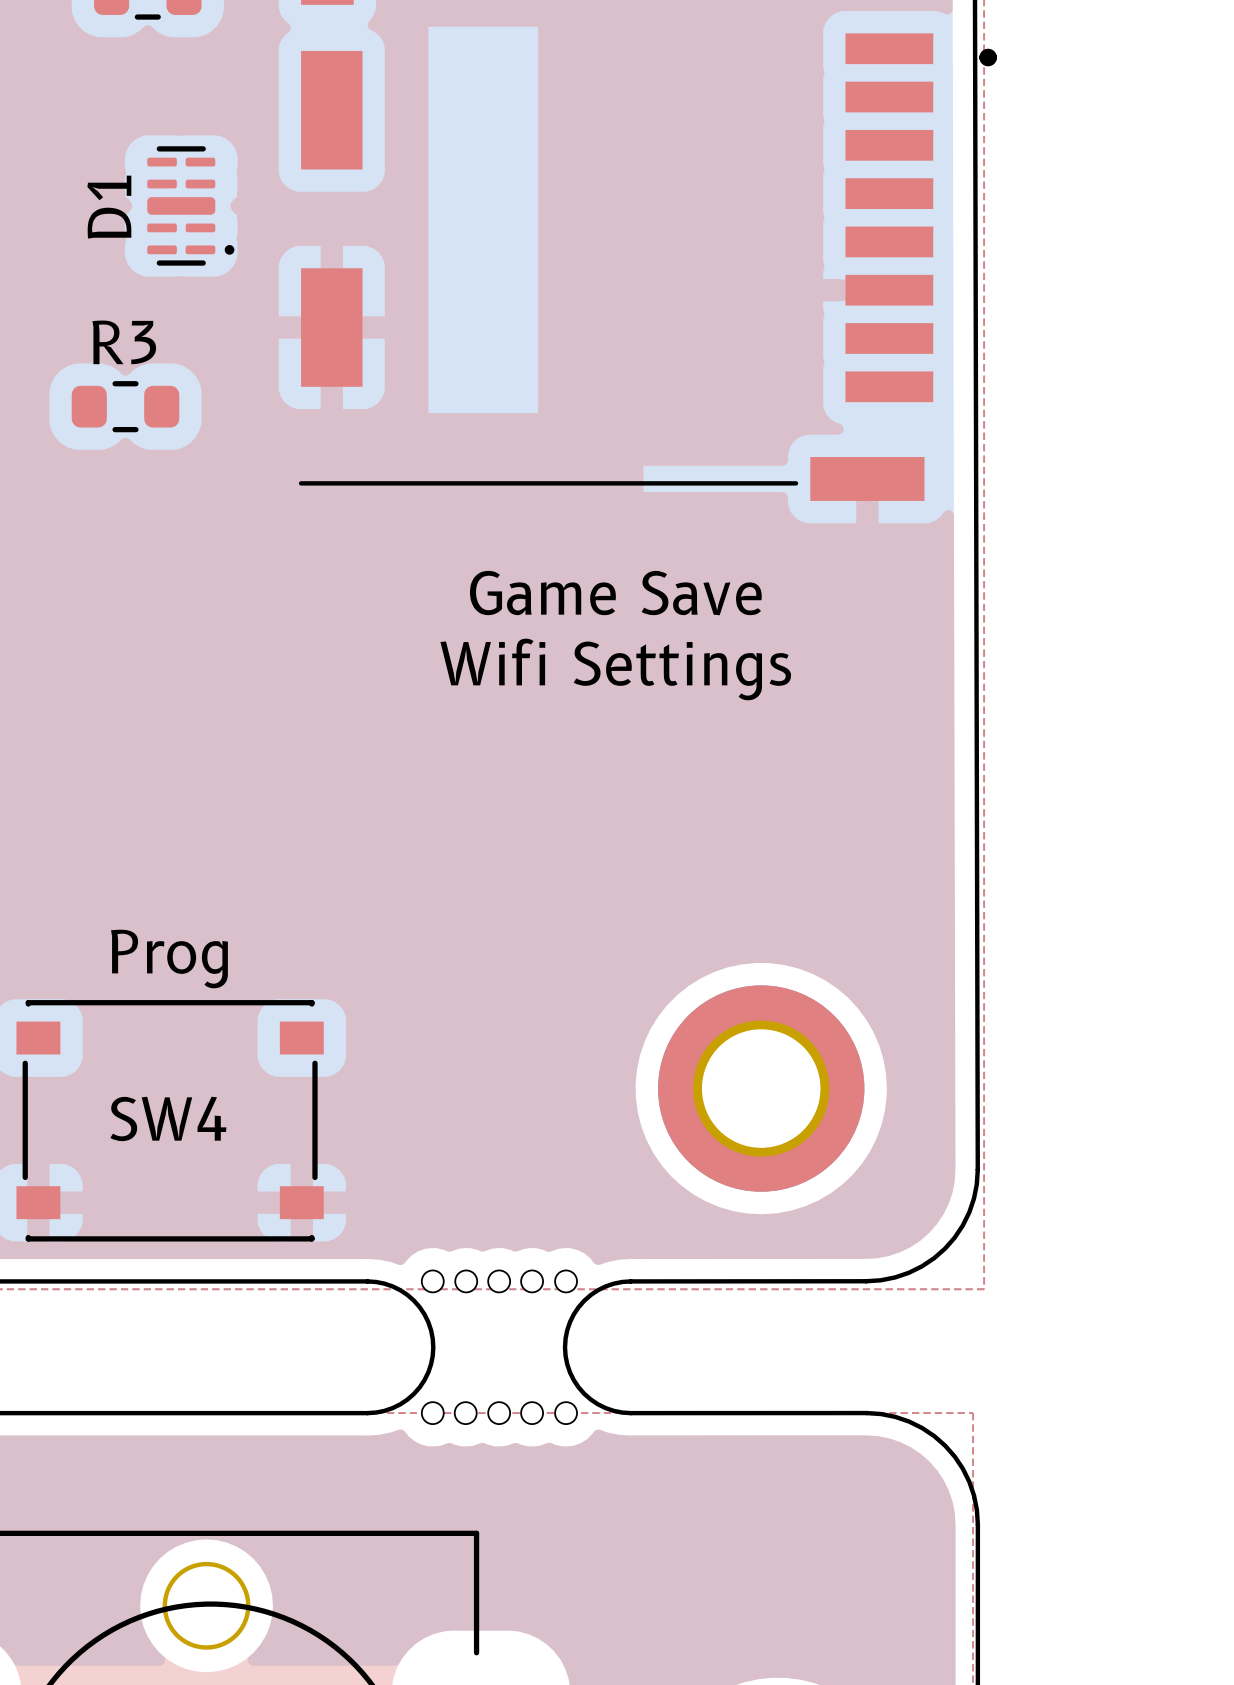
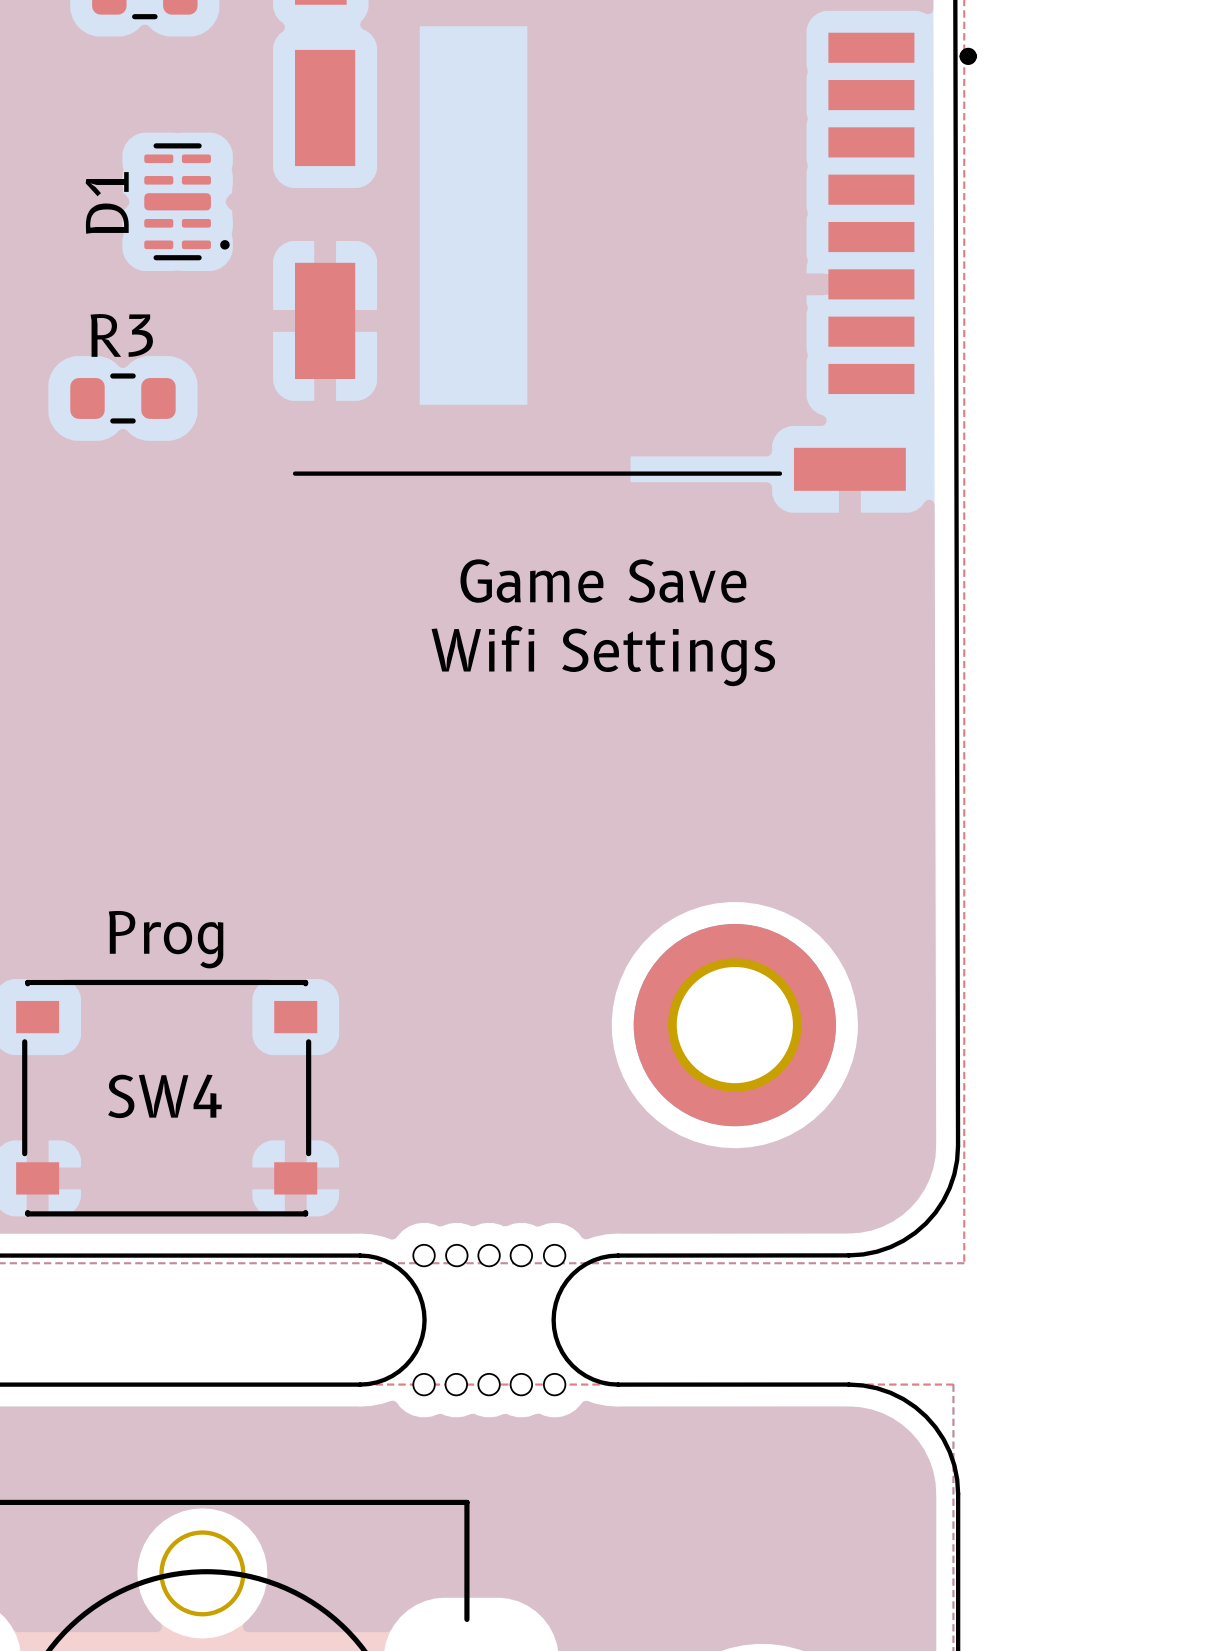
part position: (761, 1088) -> (734, 1025)

